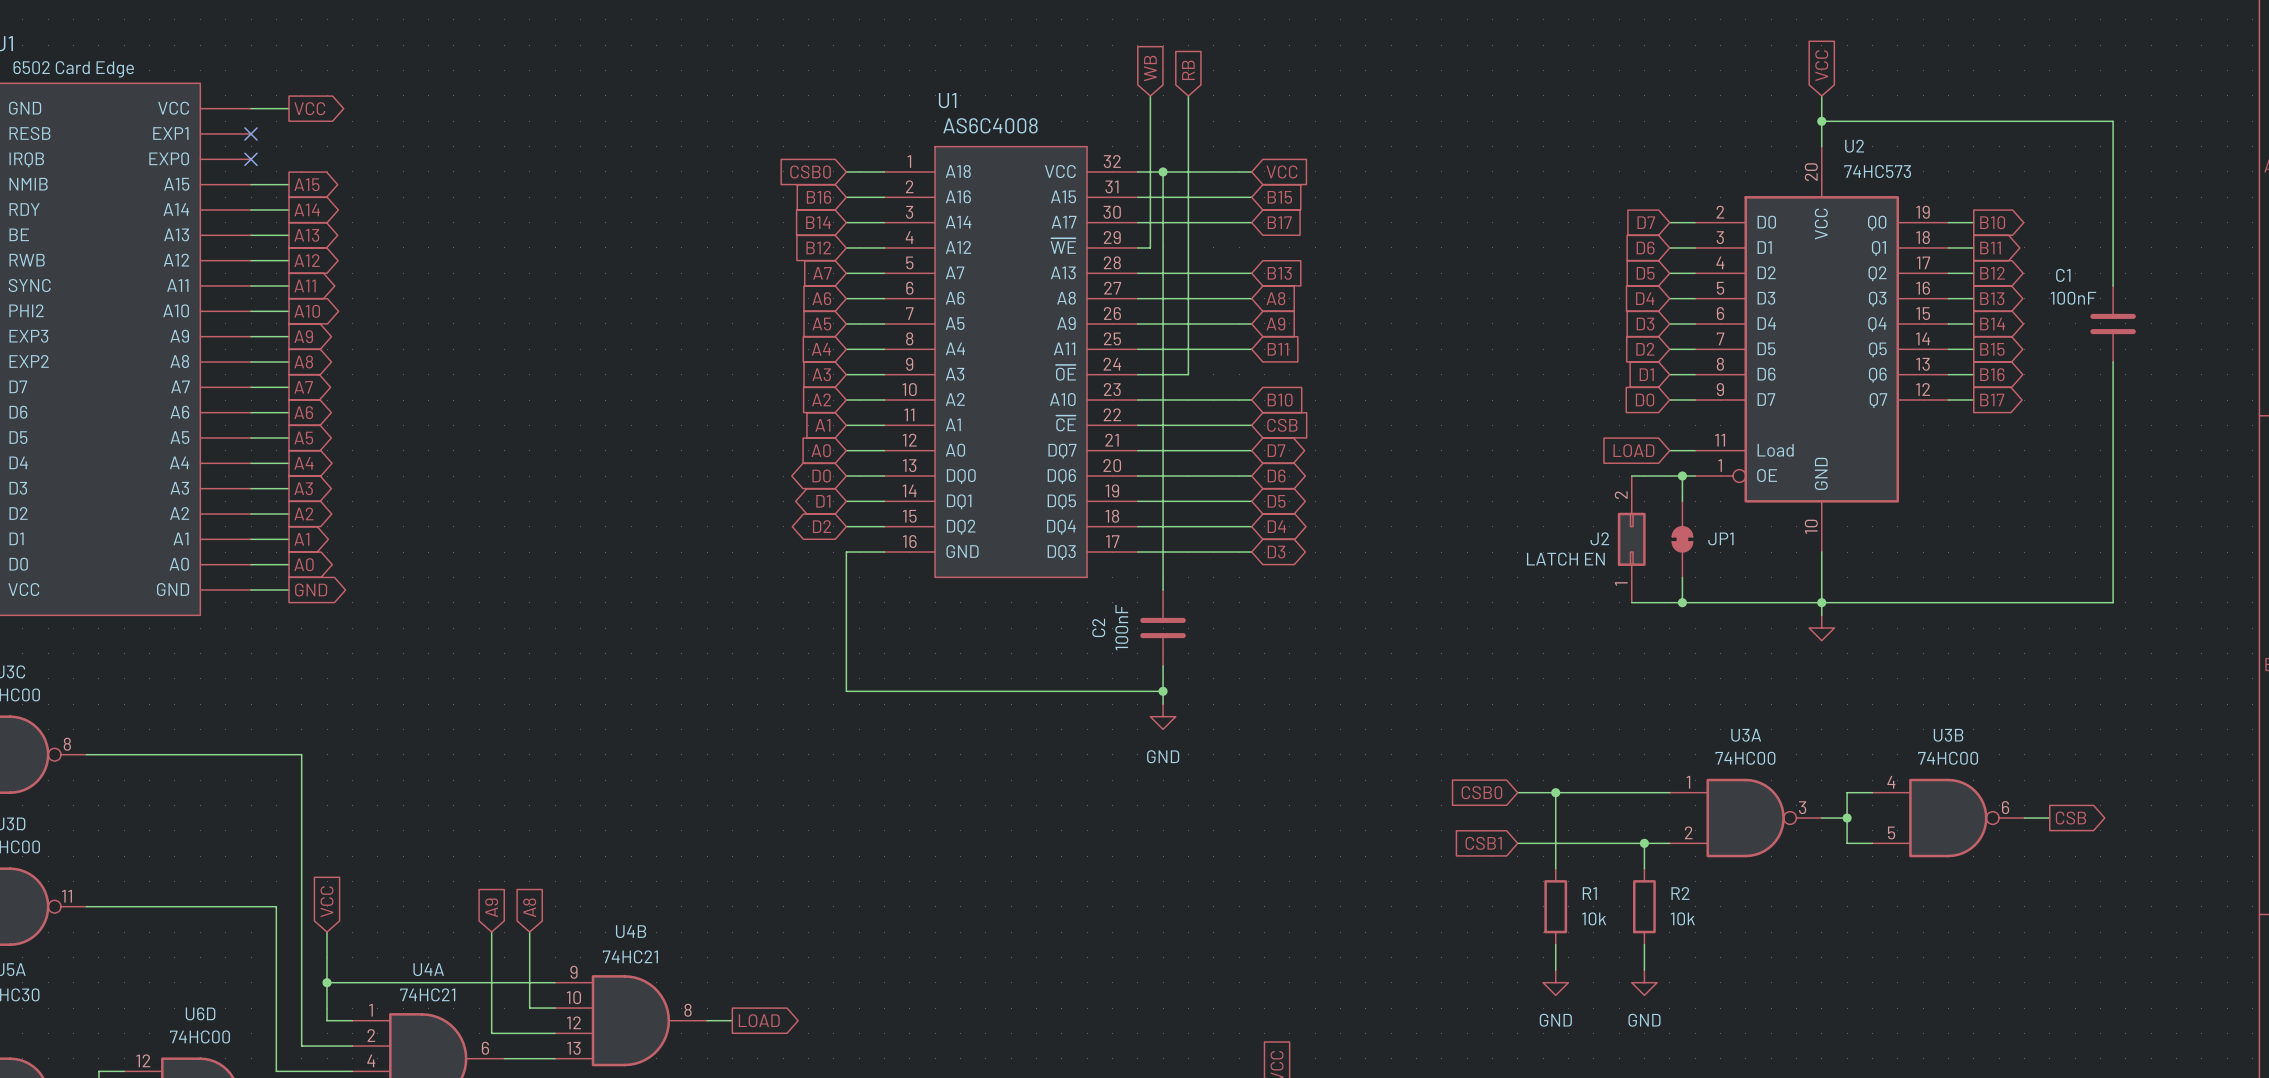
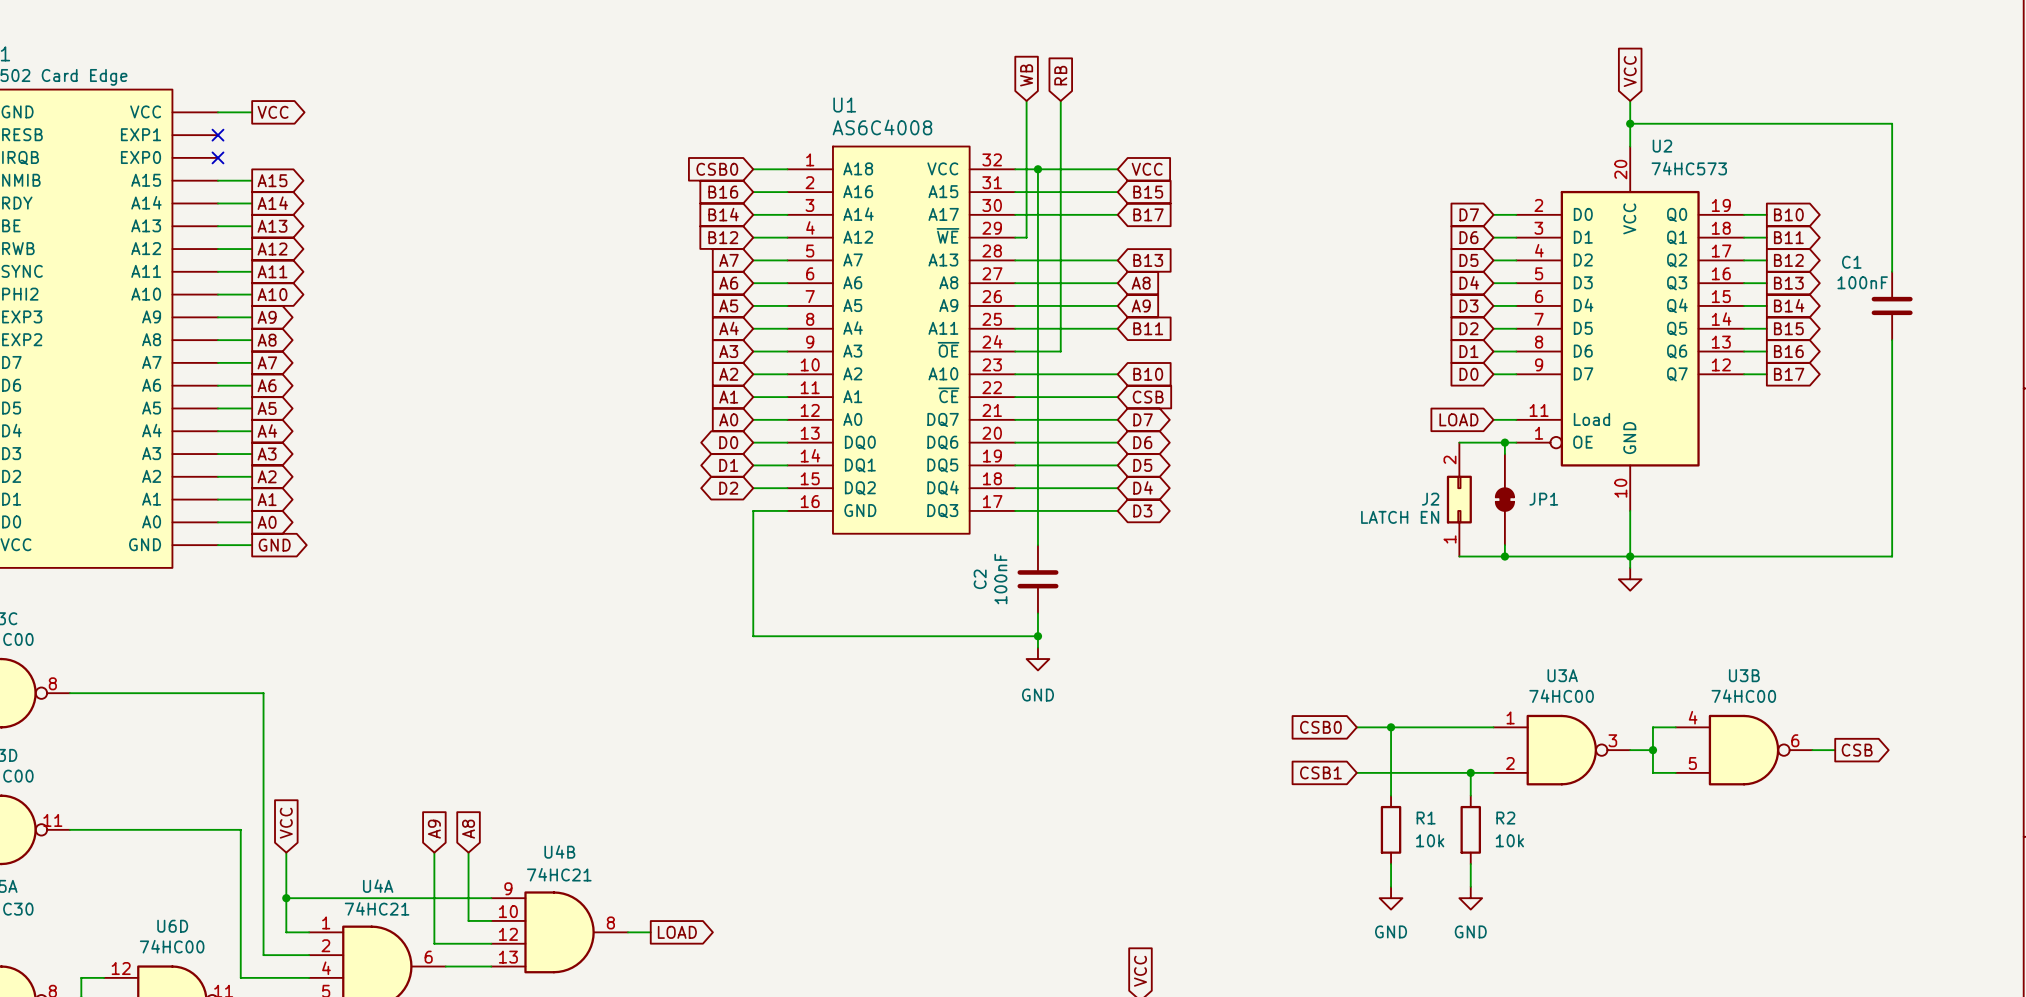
JP1 symbol: [1672, 501, 1693, 578] -> [1495, 454, 1515, 546]

